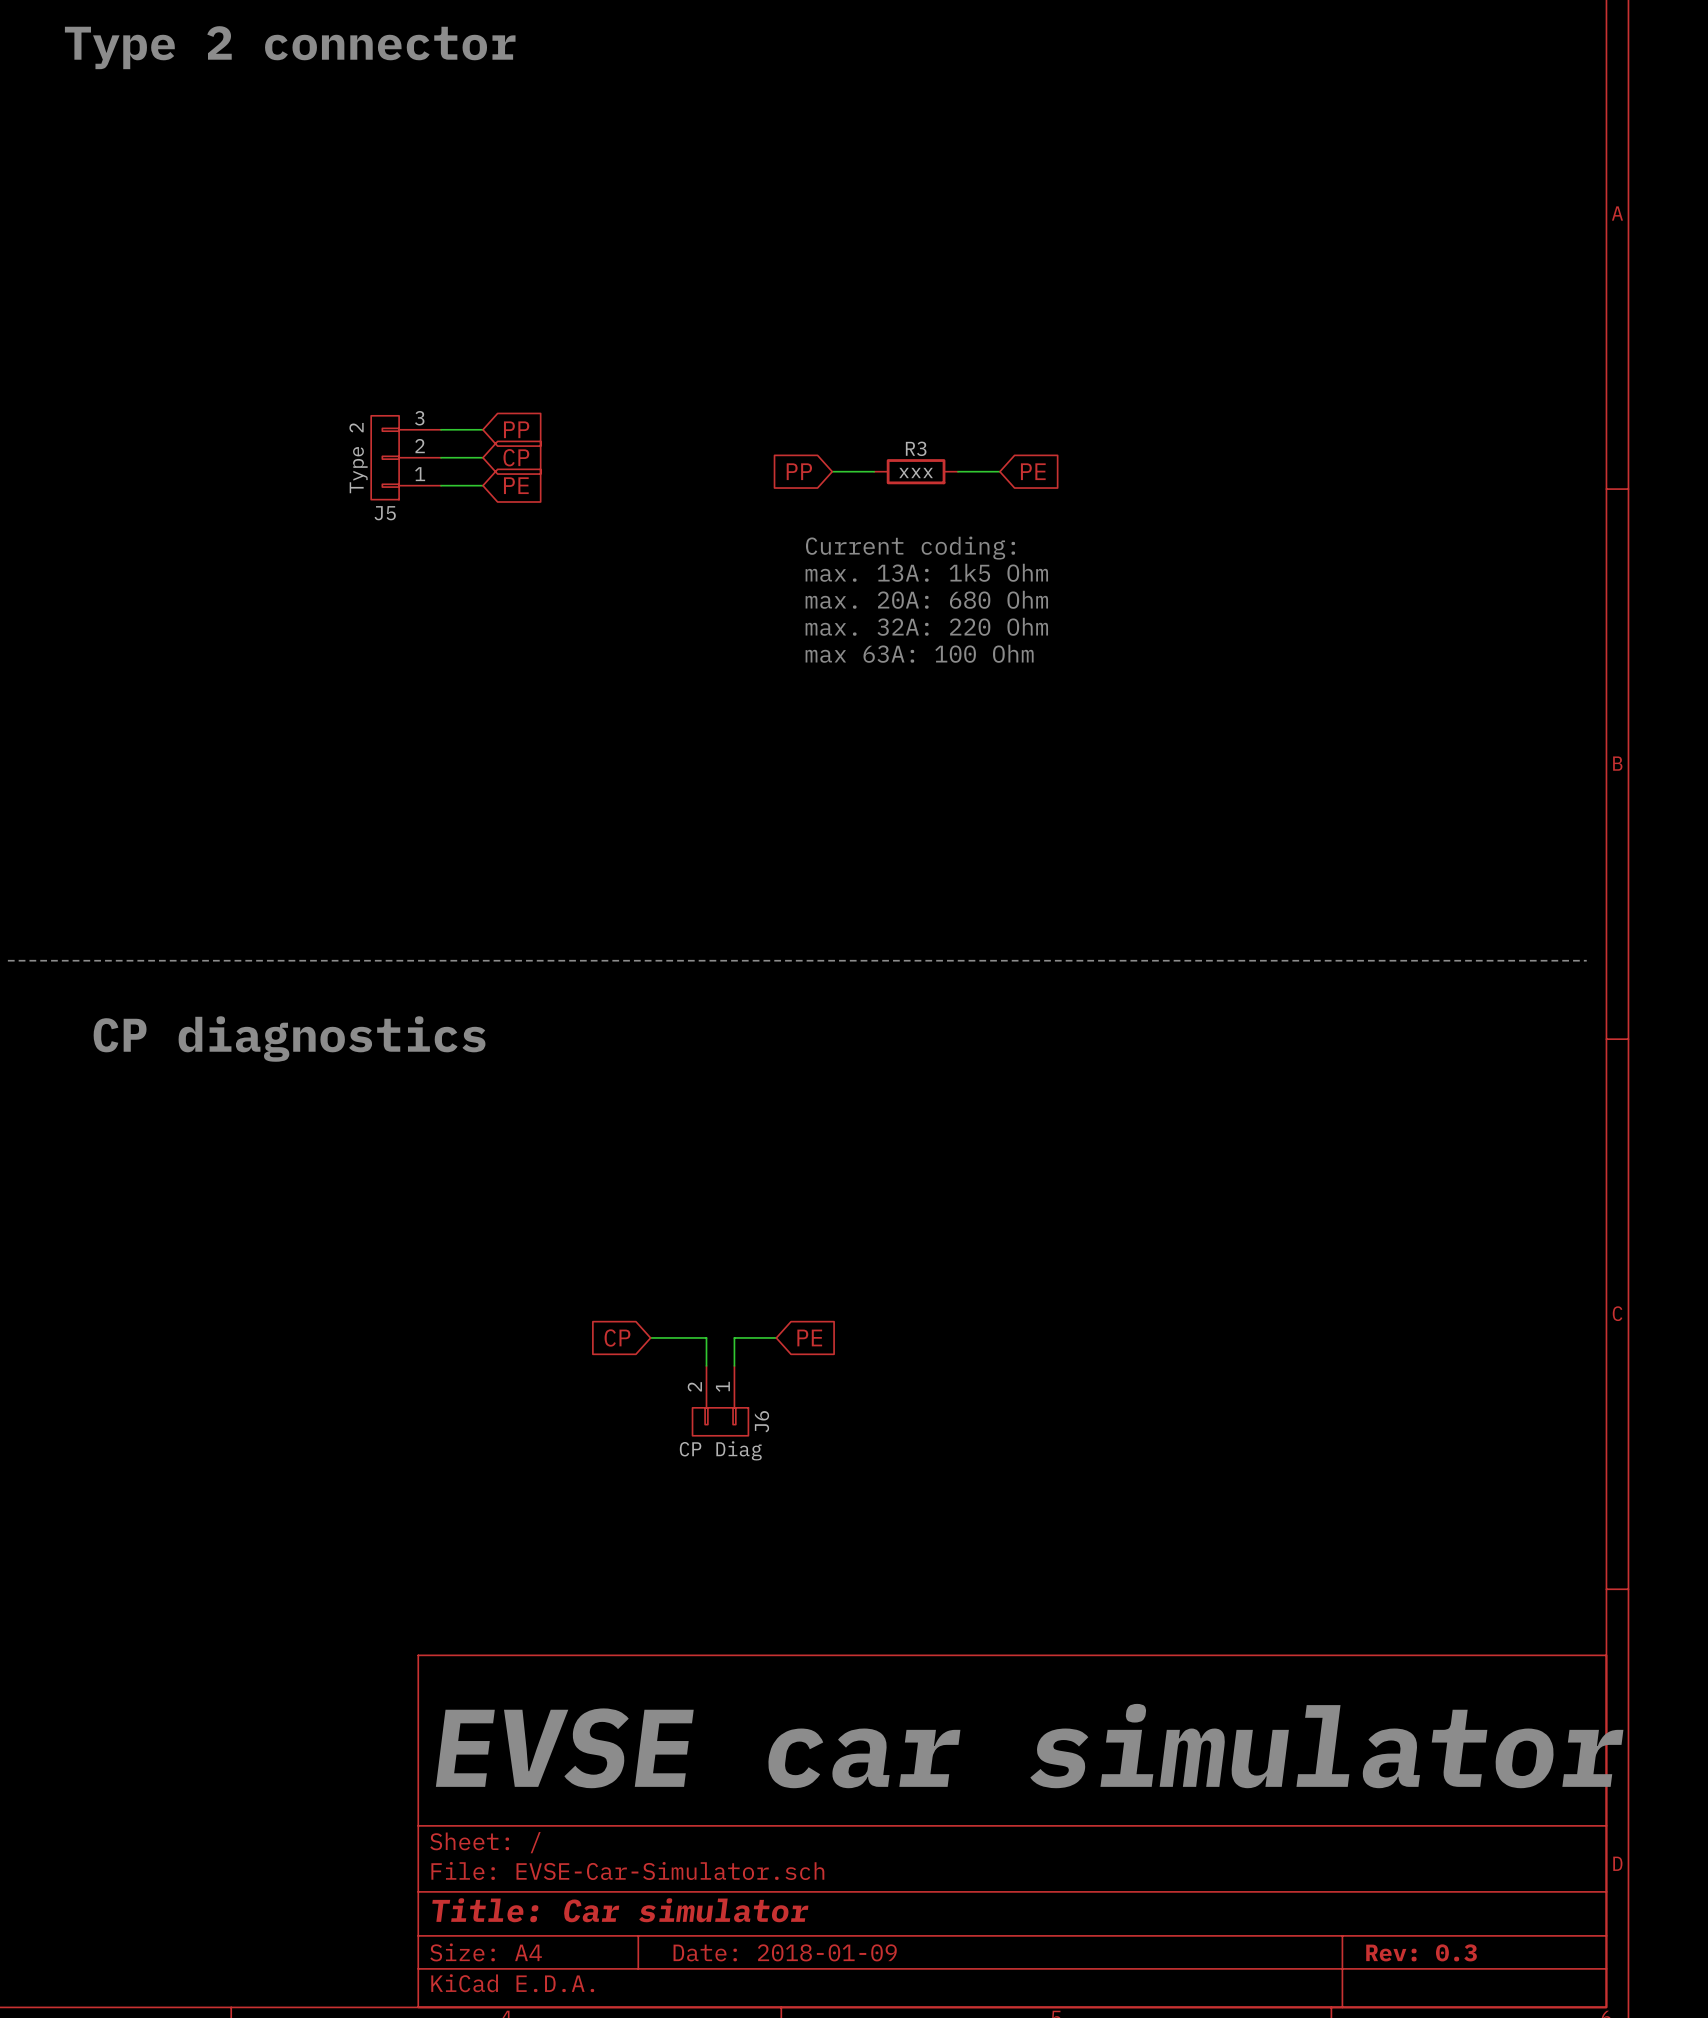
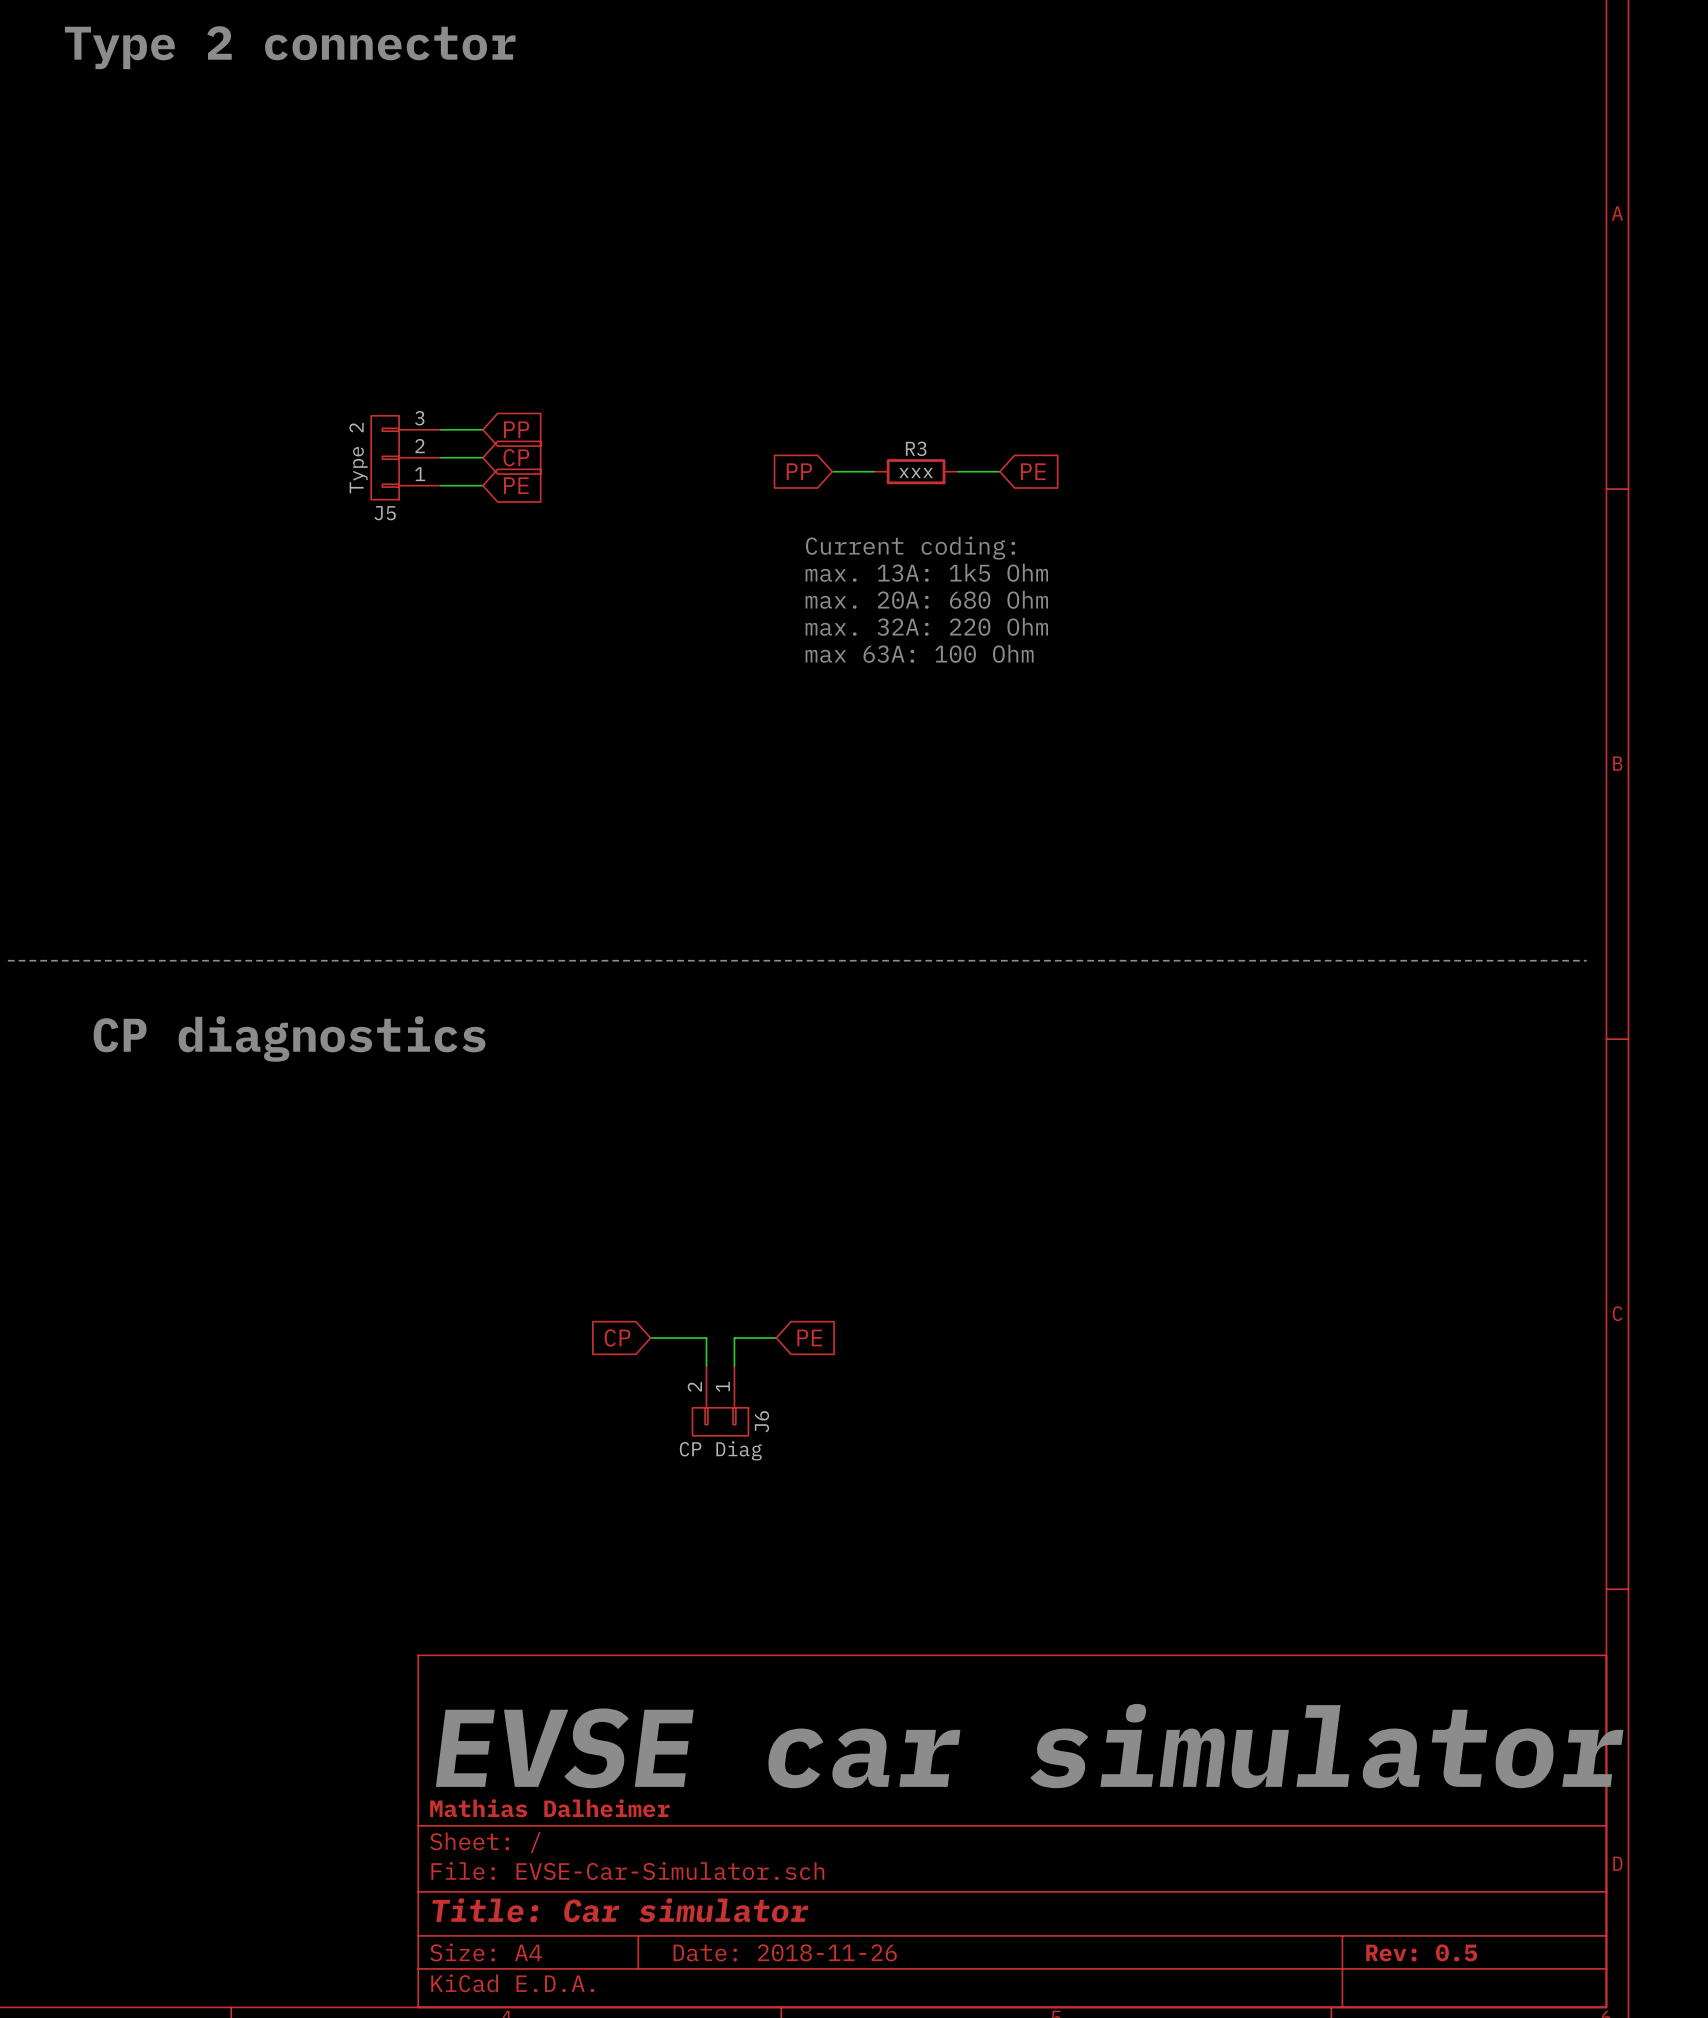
title block: none -> Mathias Dalheimer (549, 1808)
title block: Date: 2018-01-09 (785, 1952) -> Date: 2018-11-26 (785, 1952)
title block: Rev: 0.3 (1421, 1952) -> Rev: 0.5 (1421, 1952)

